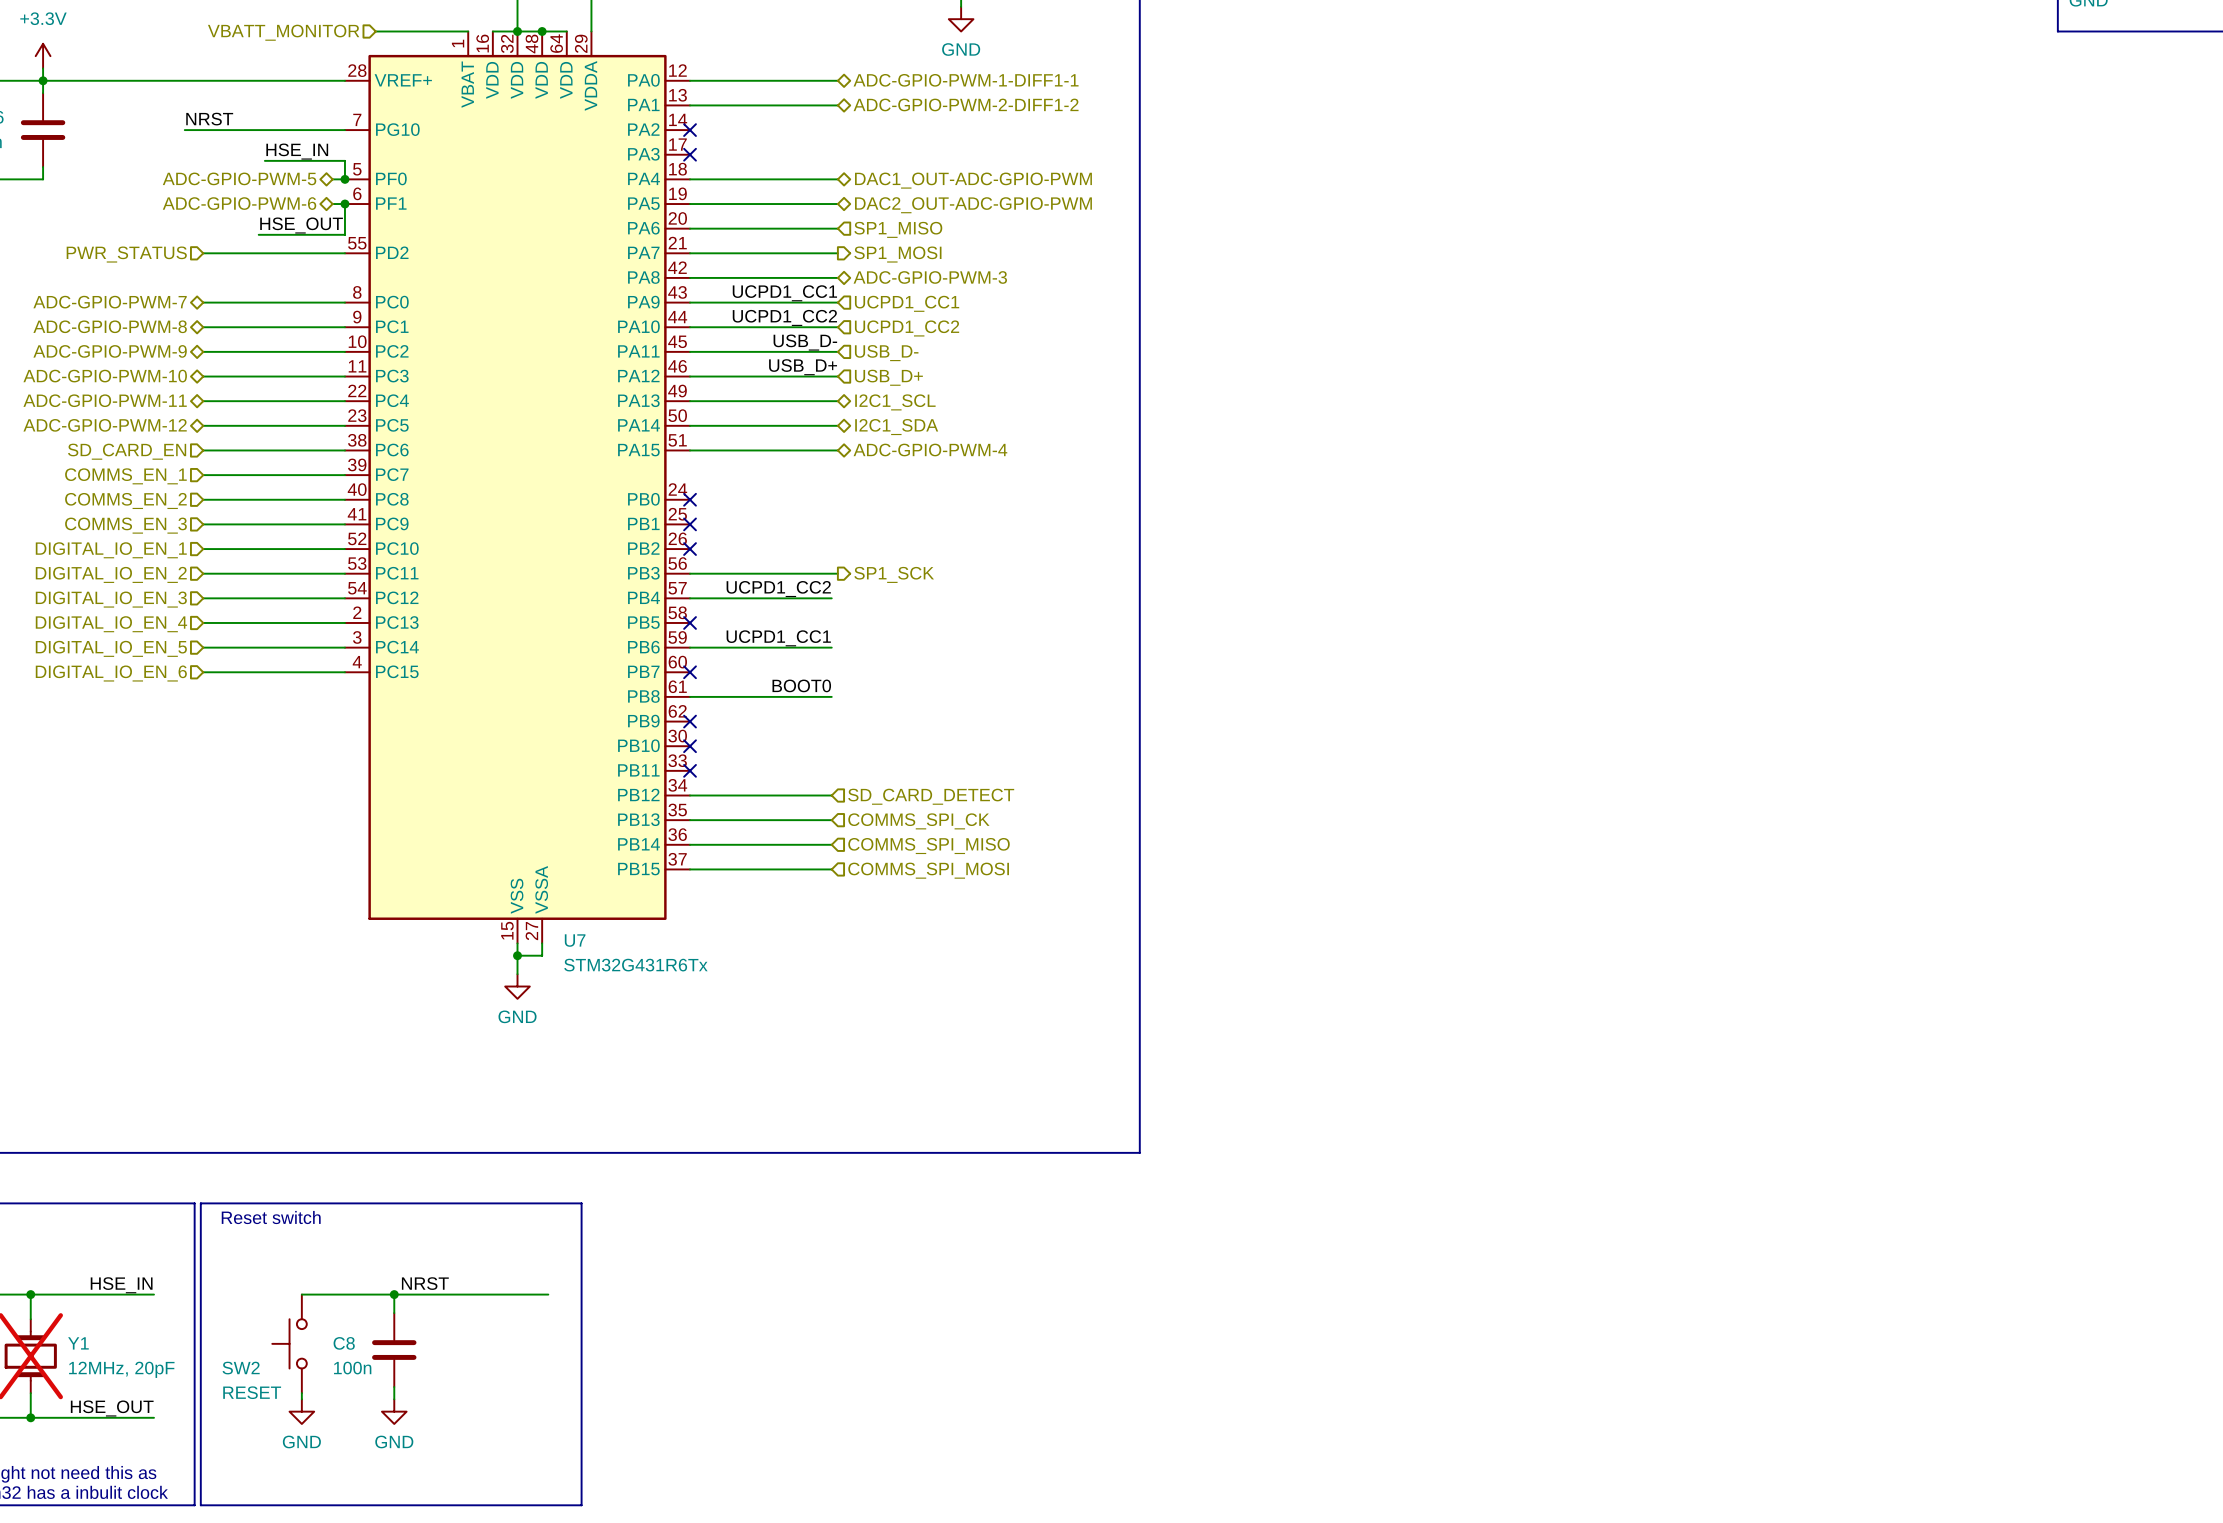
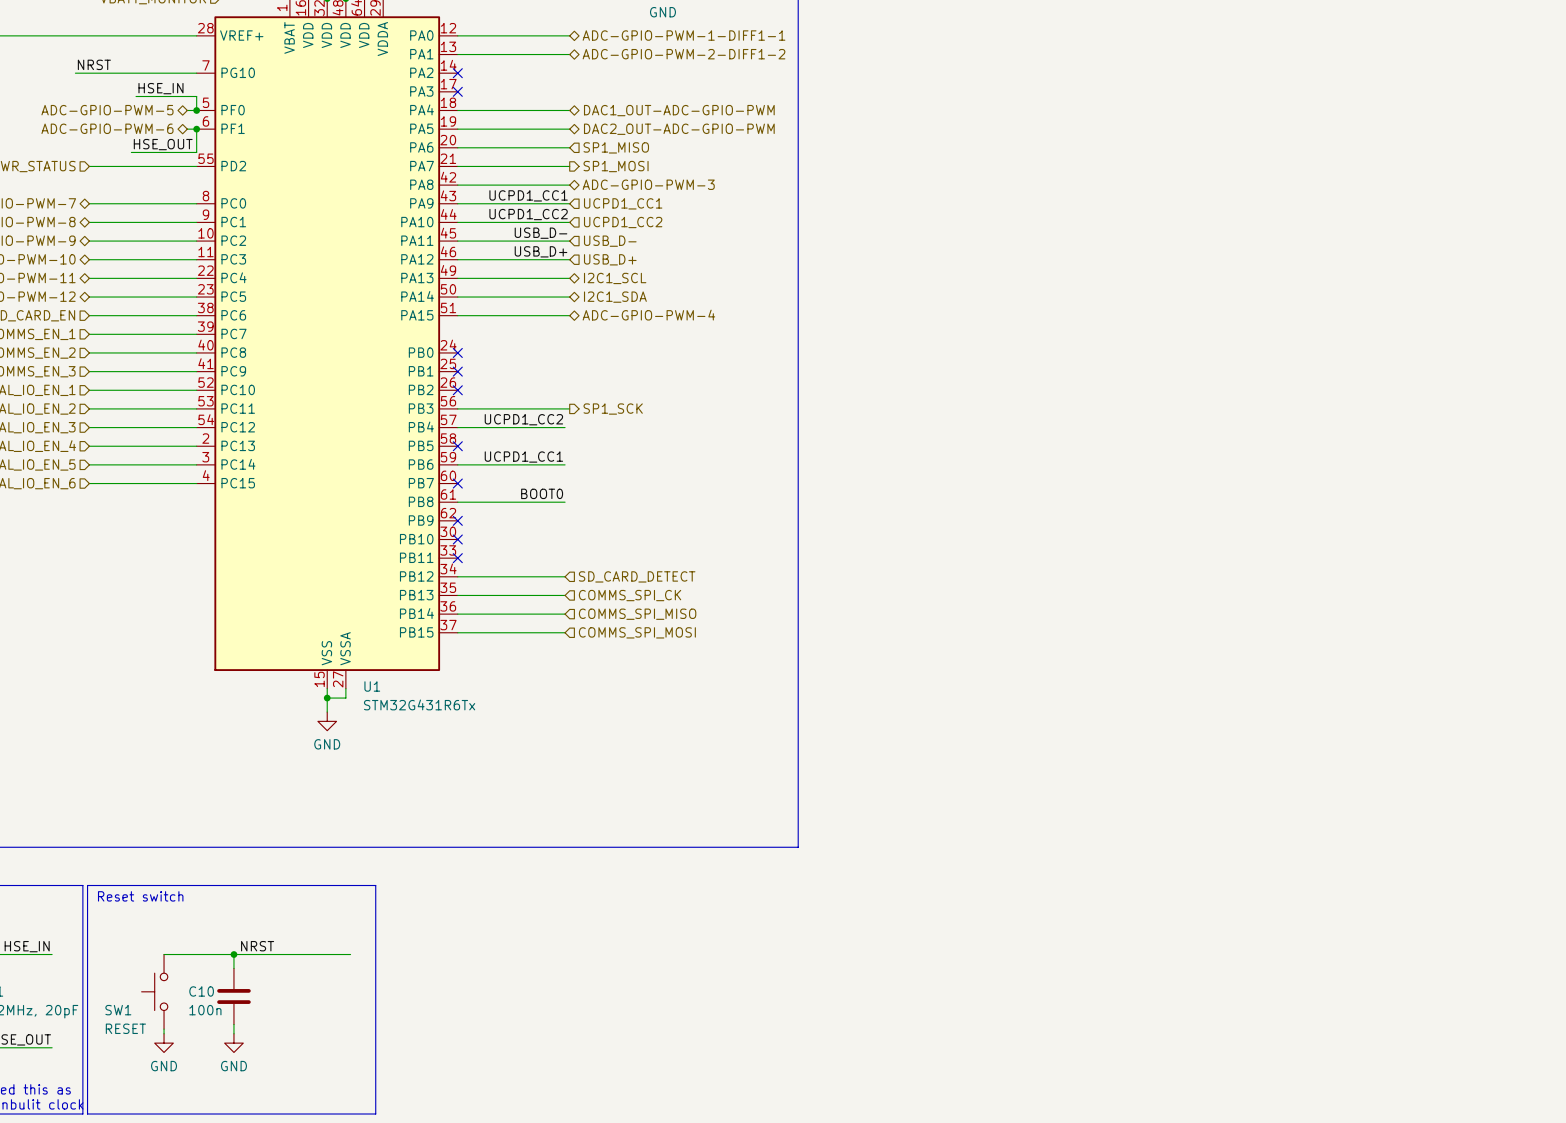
U7 name: U7 (575, 940) -> U1 (372, 686)
C8 name: C8 (344, 1343) -> C10 (201, 991)
SW2 name: SW2 (241, 1368) -> SW1 (118, 1010)

